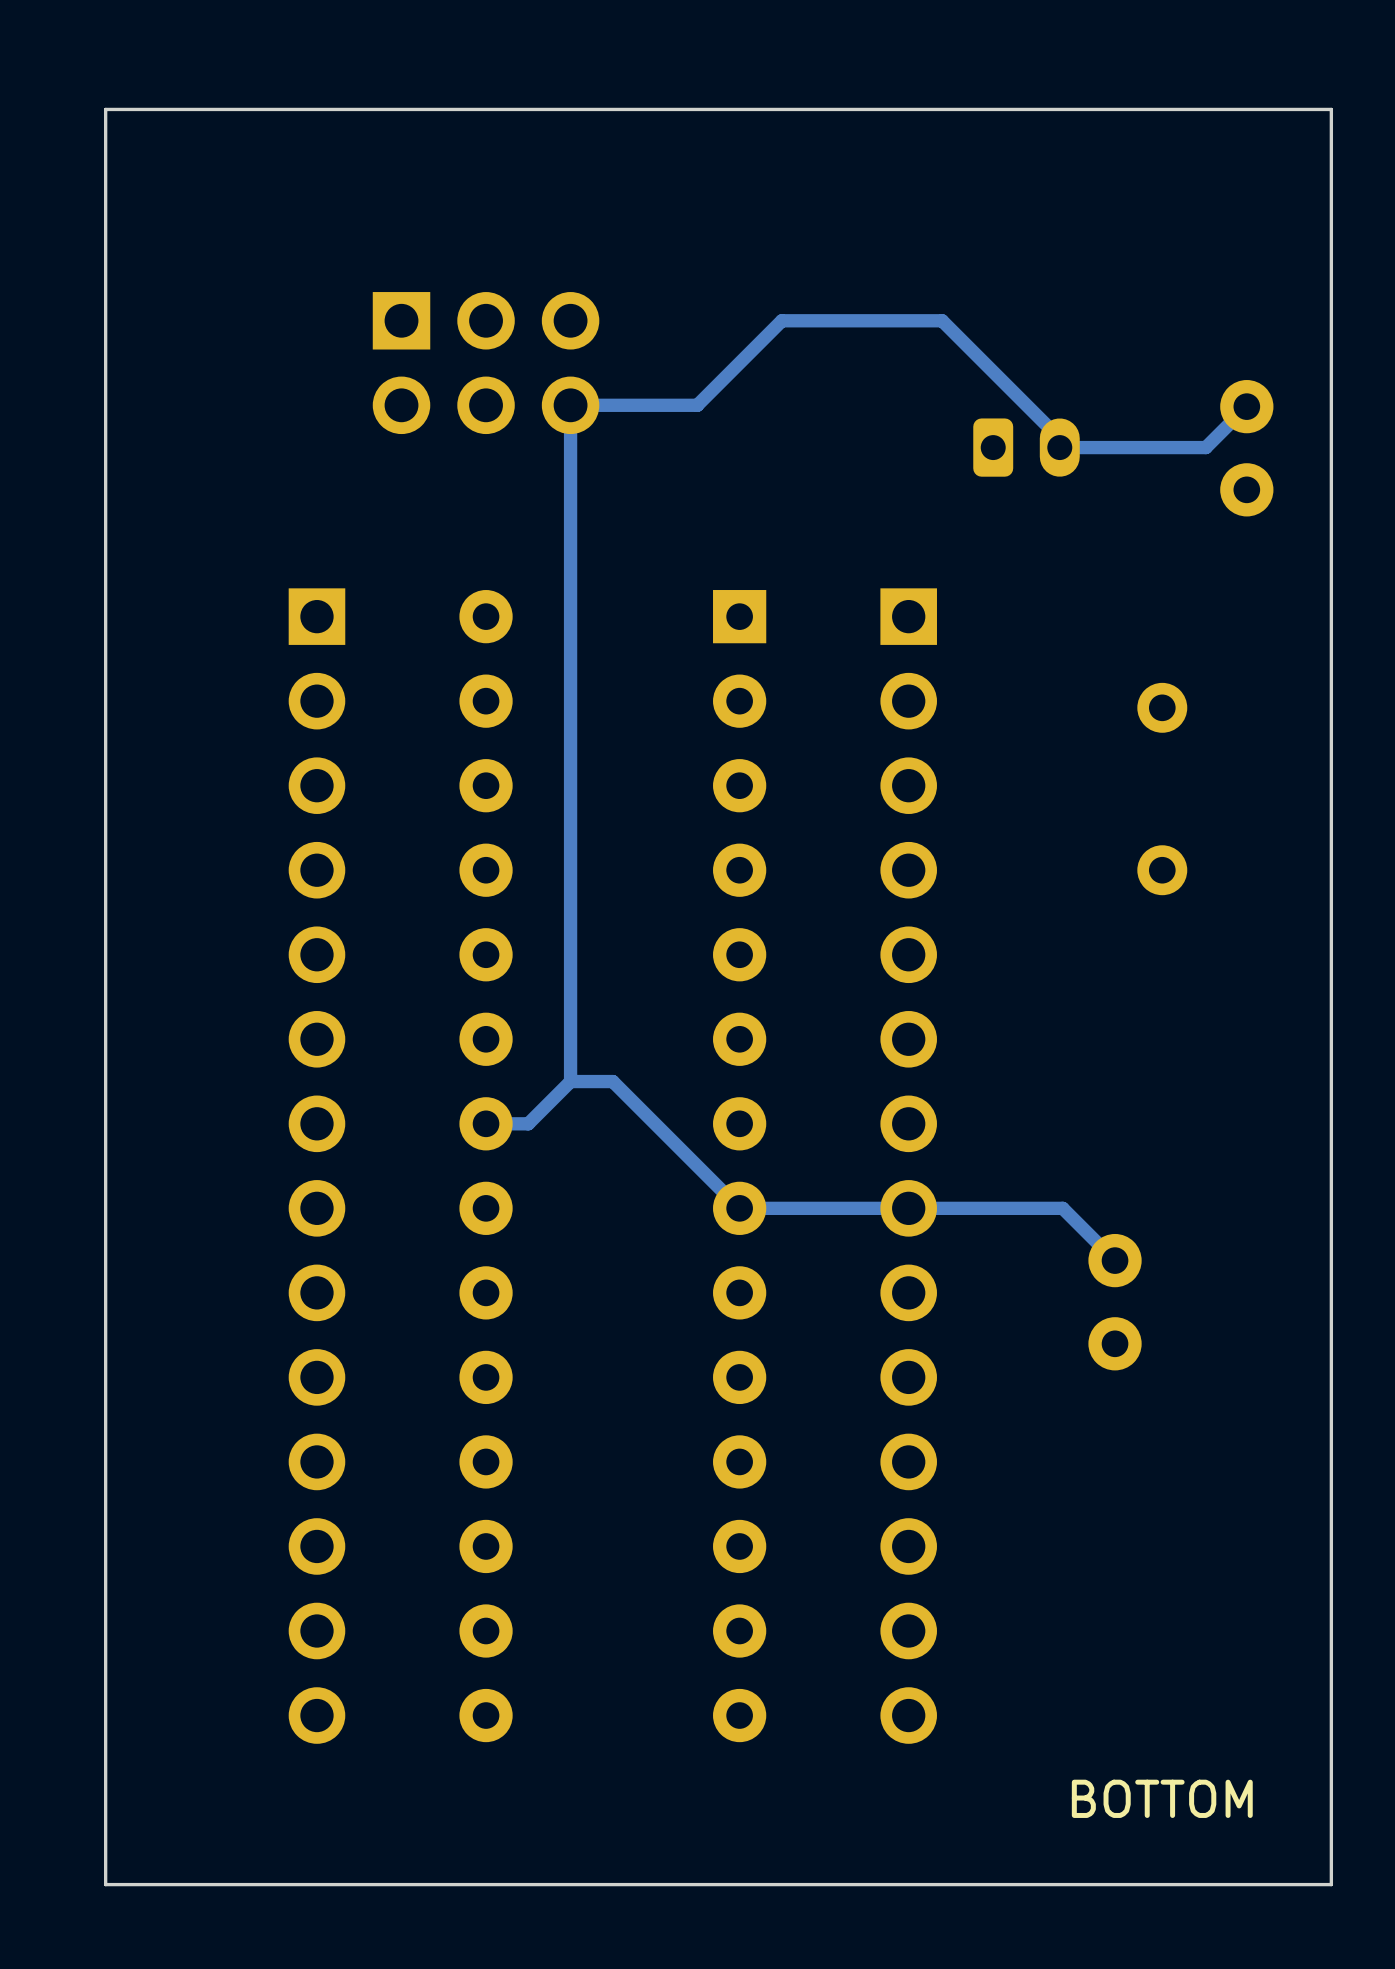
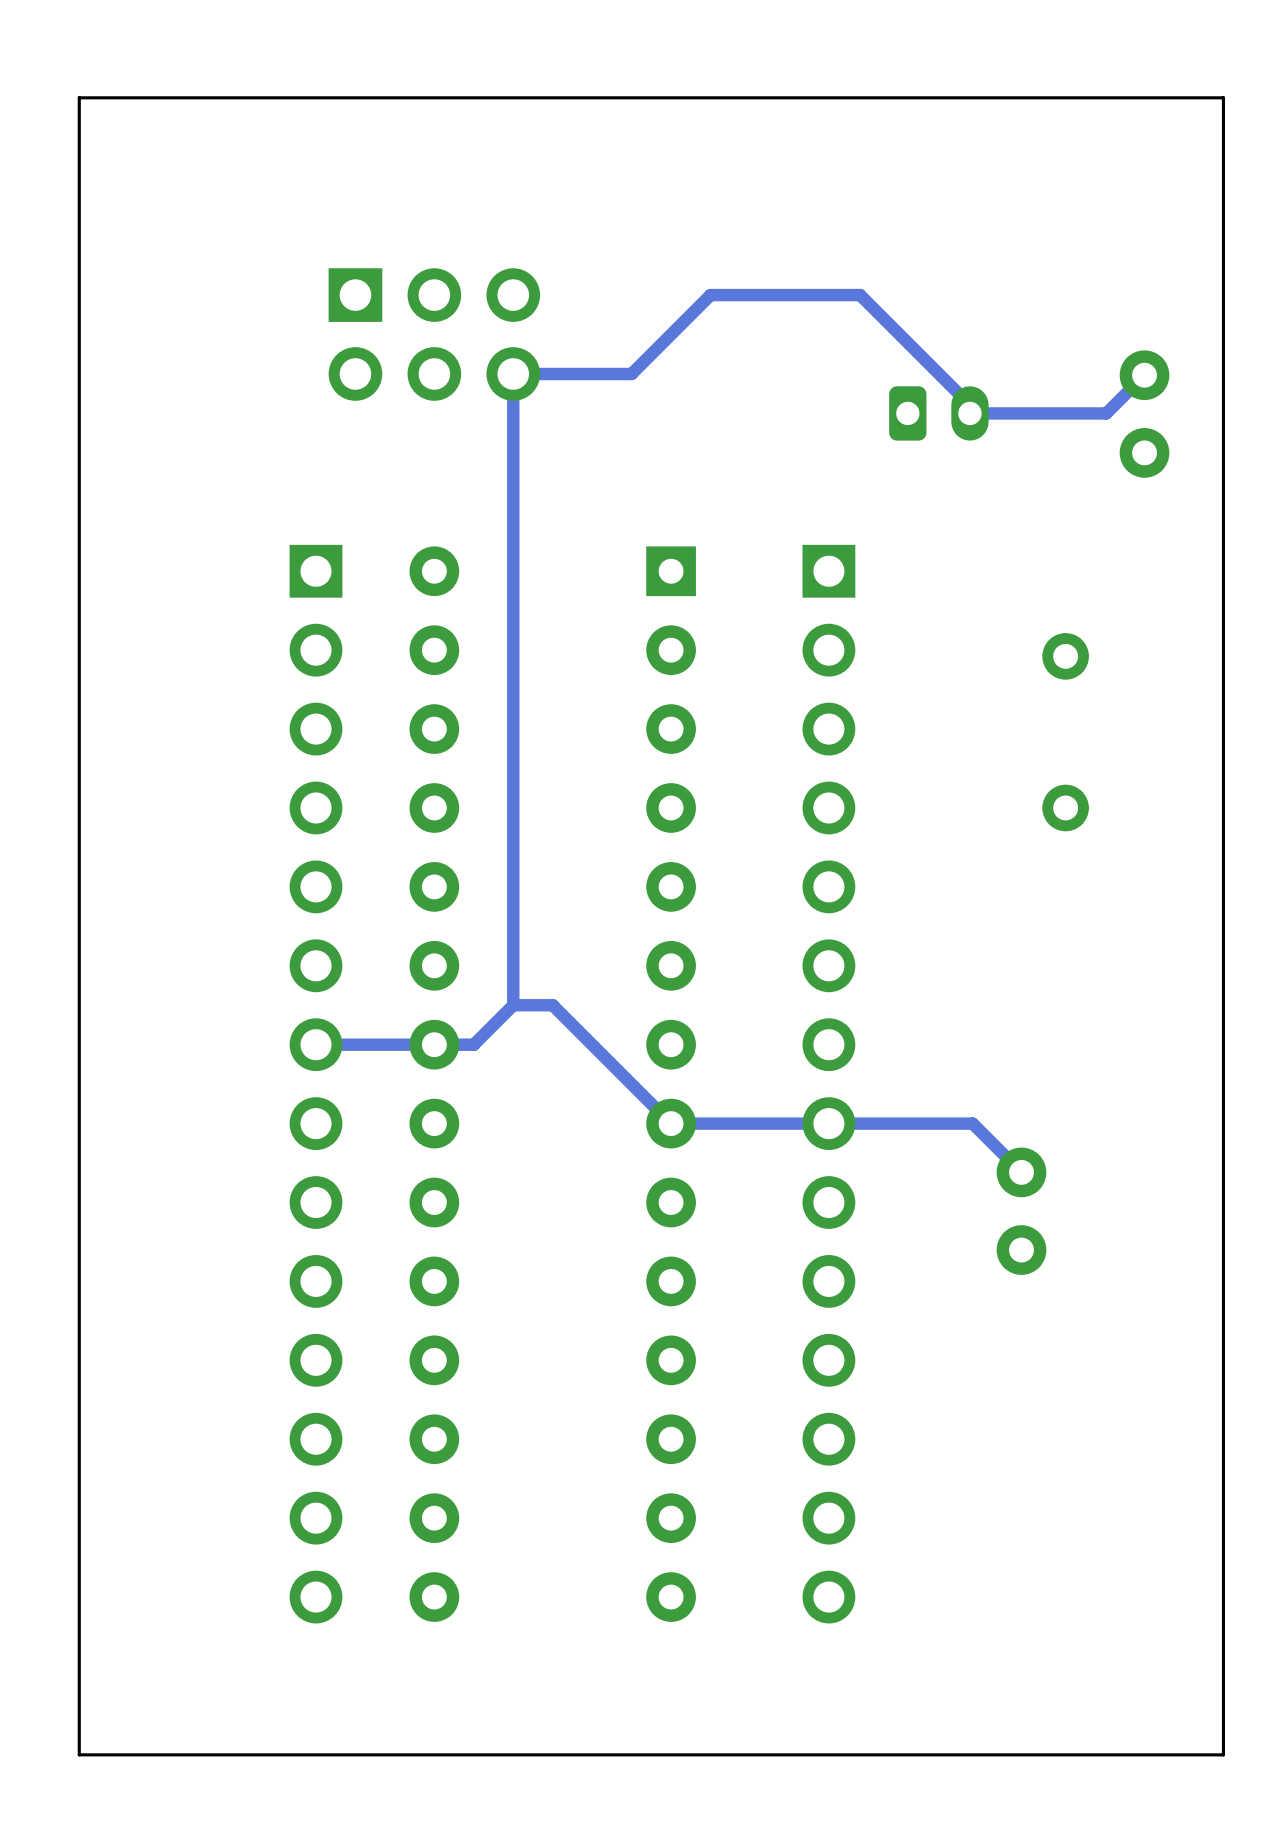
track: none -> (434, 1044) (316, 1044)
part position: (316, 1166) -> (316, 1084)
text: BOTTOM (1162, 1798) -> none

